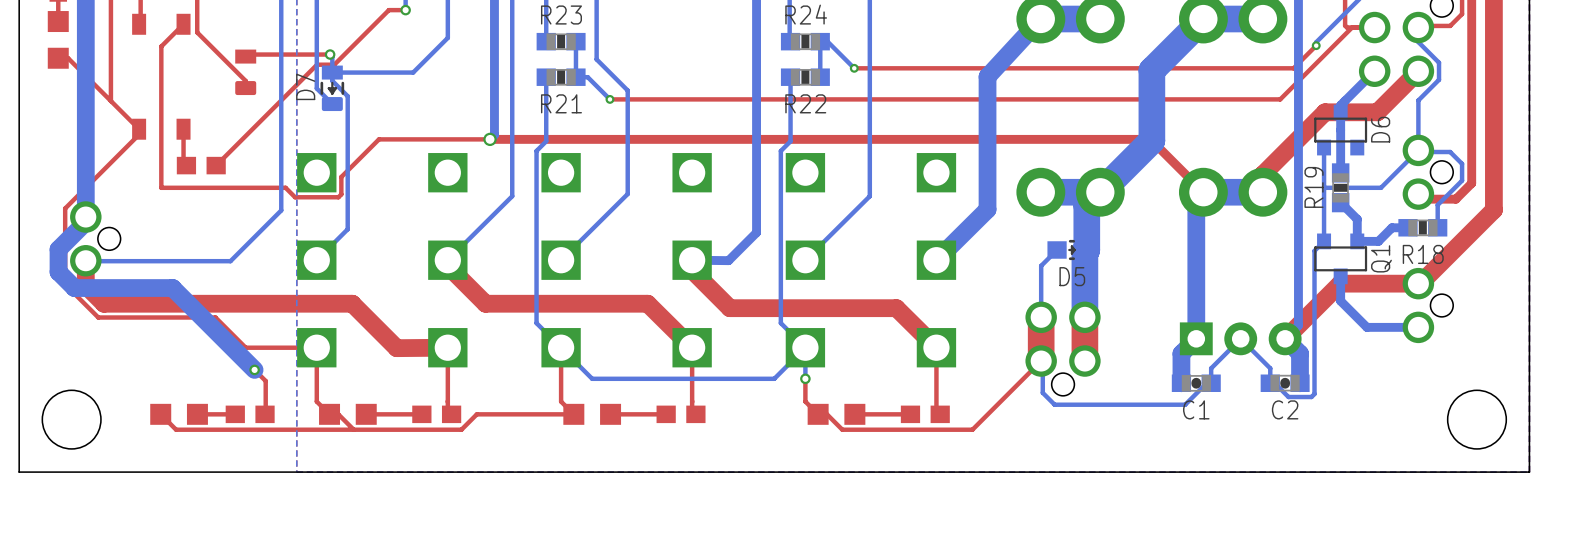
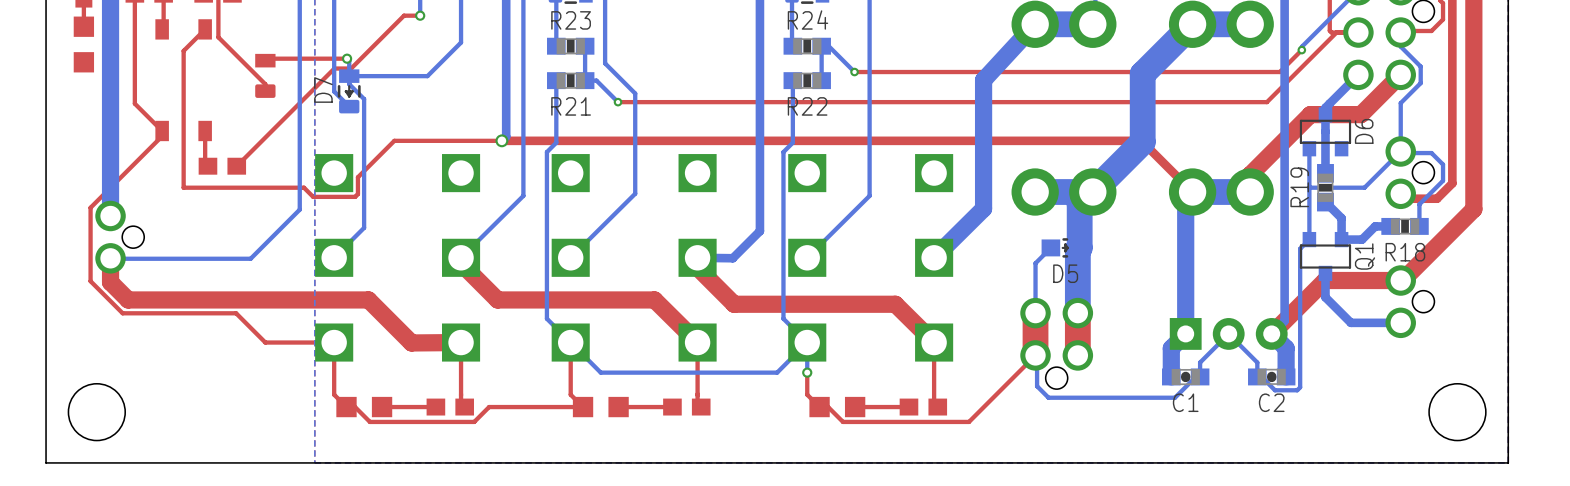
top track: (58, 58) (68, 58) (110, 101) -> none
bottom track: (85, 217) (85, 222) (58, 249) (58, 272) (74, 288) (172, 288) (254, 369) -> none
top track: (254, 369) (265, 381) (265, 414) -> none
via: (254, 369) -> none
top track: (160, 414) (176, 429) (353, 429) -> none
part: (179, 414) -> none
top track: (235, 414) (197, 414) -> none
part: (250, 414) -> none

